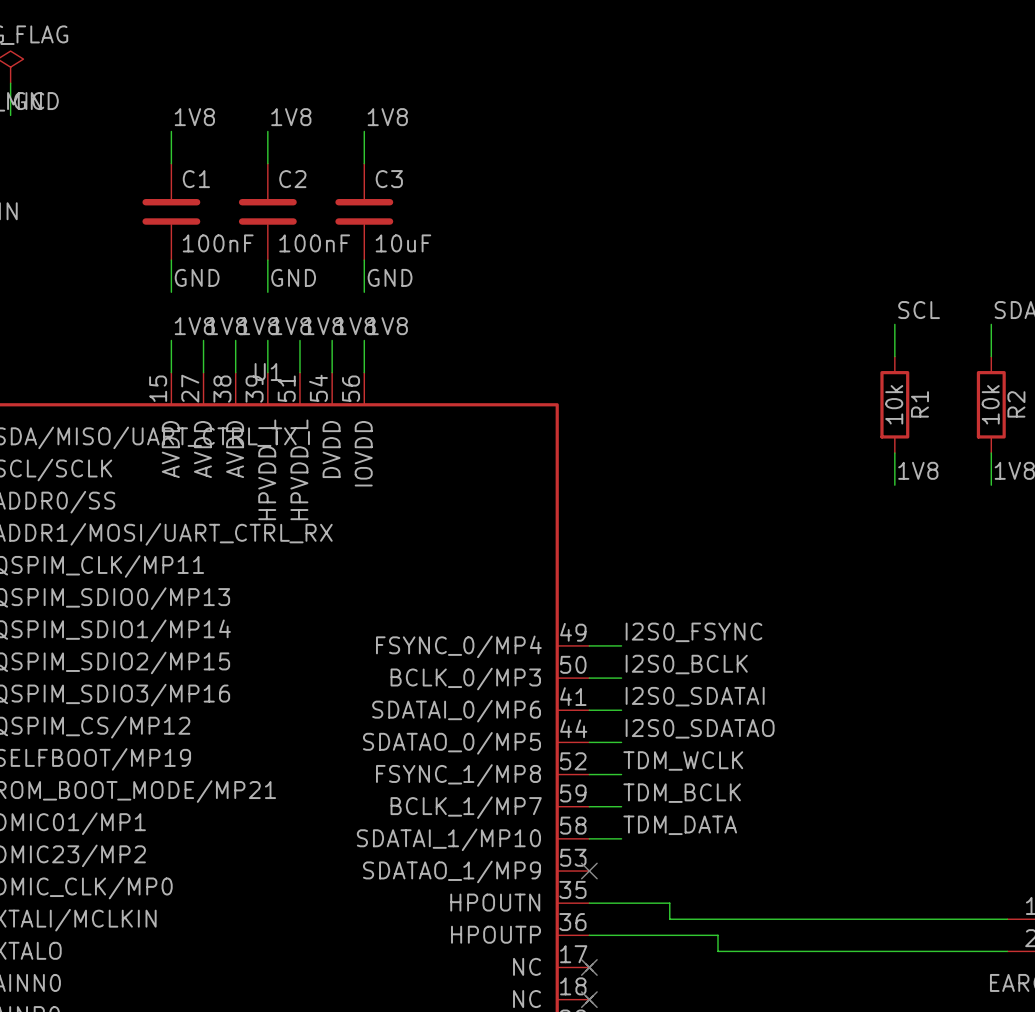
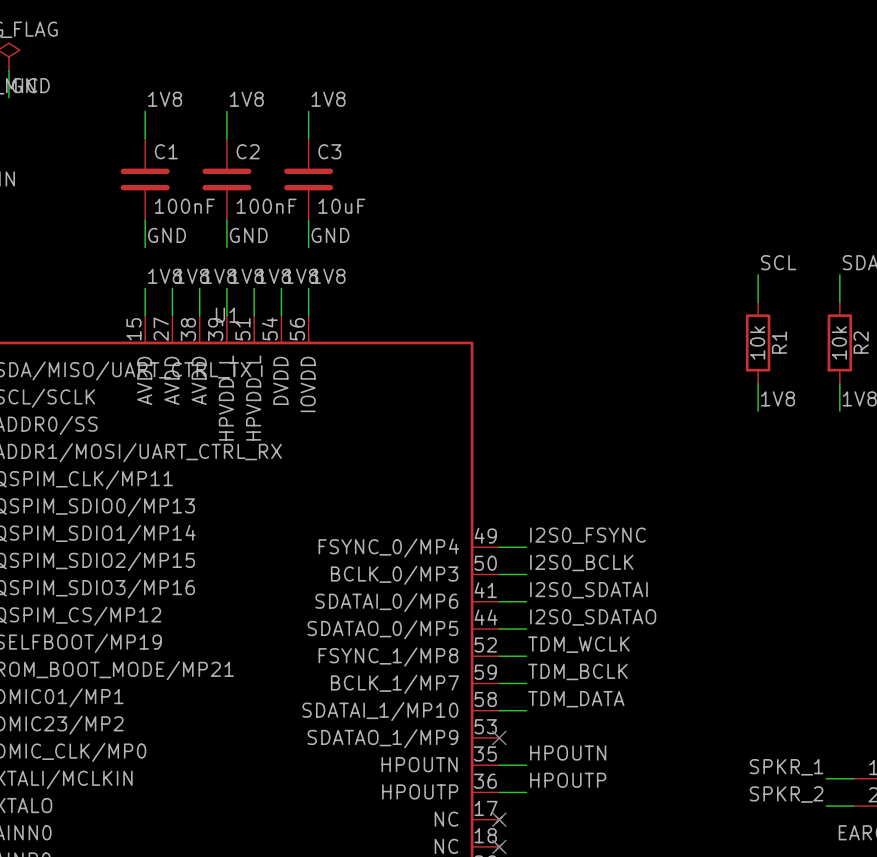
label: none -> HPOUTN (568, 753)
wire: (621, 903) (669, 903) (669, 919) (975, 919) -> none
label: none -> SPKR_1 (786, 767)
label: none -> HPOUTP (568, 780)
wire: (621, 935) (717, 935) (717, 951) (975, 951) -> none
label: none -> SPKR_2 (786, 794)

